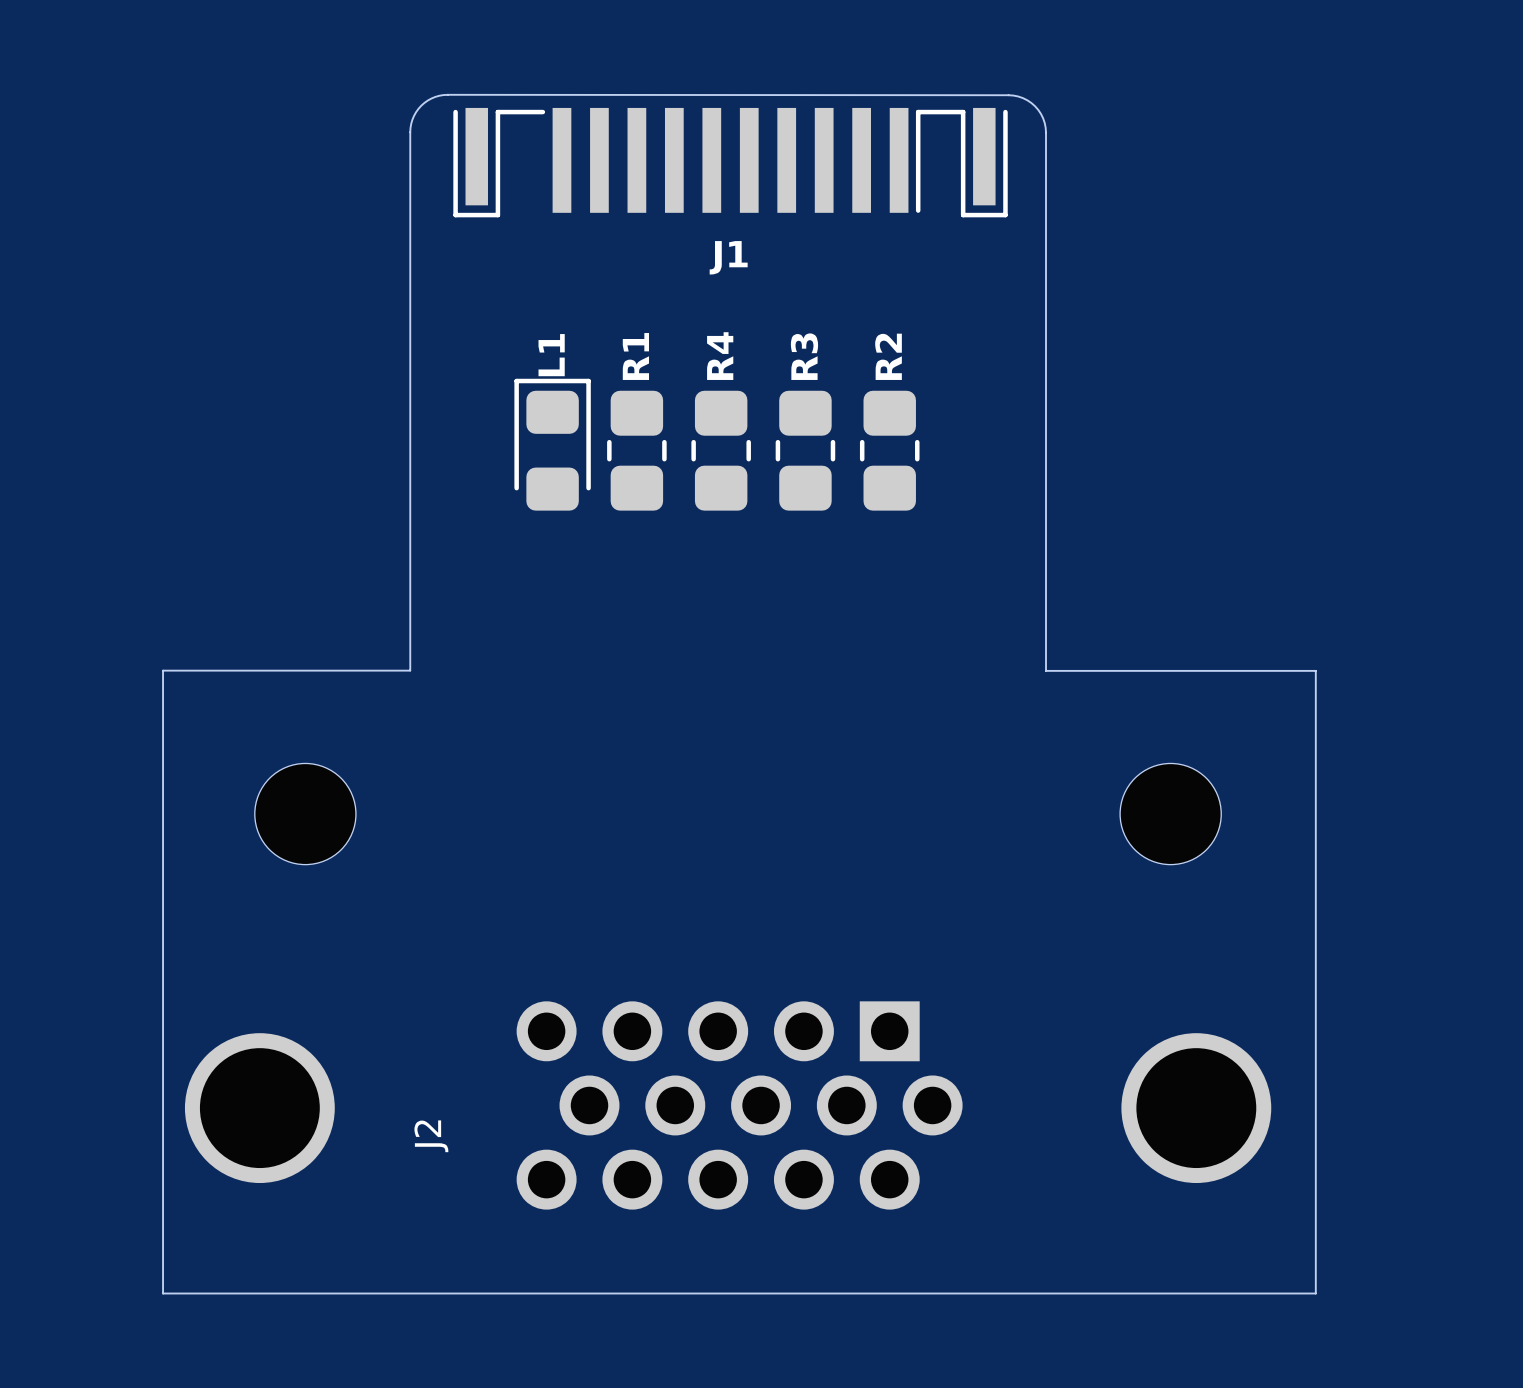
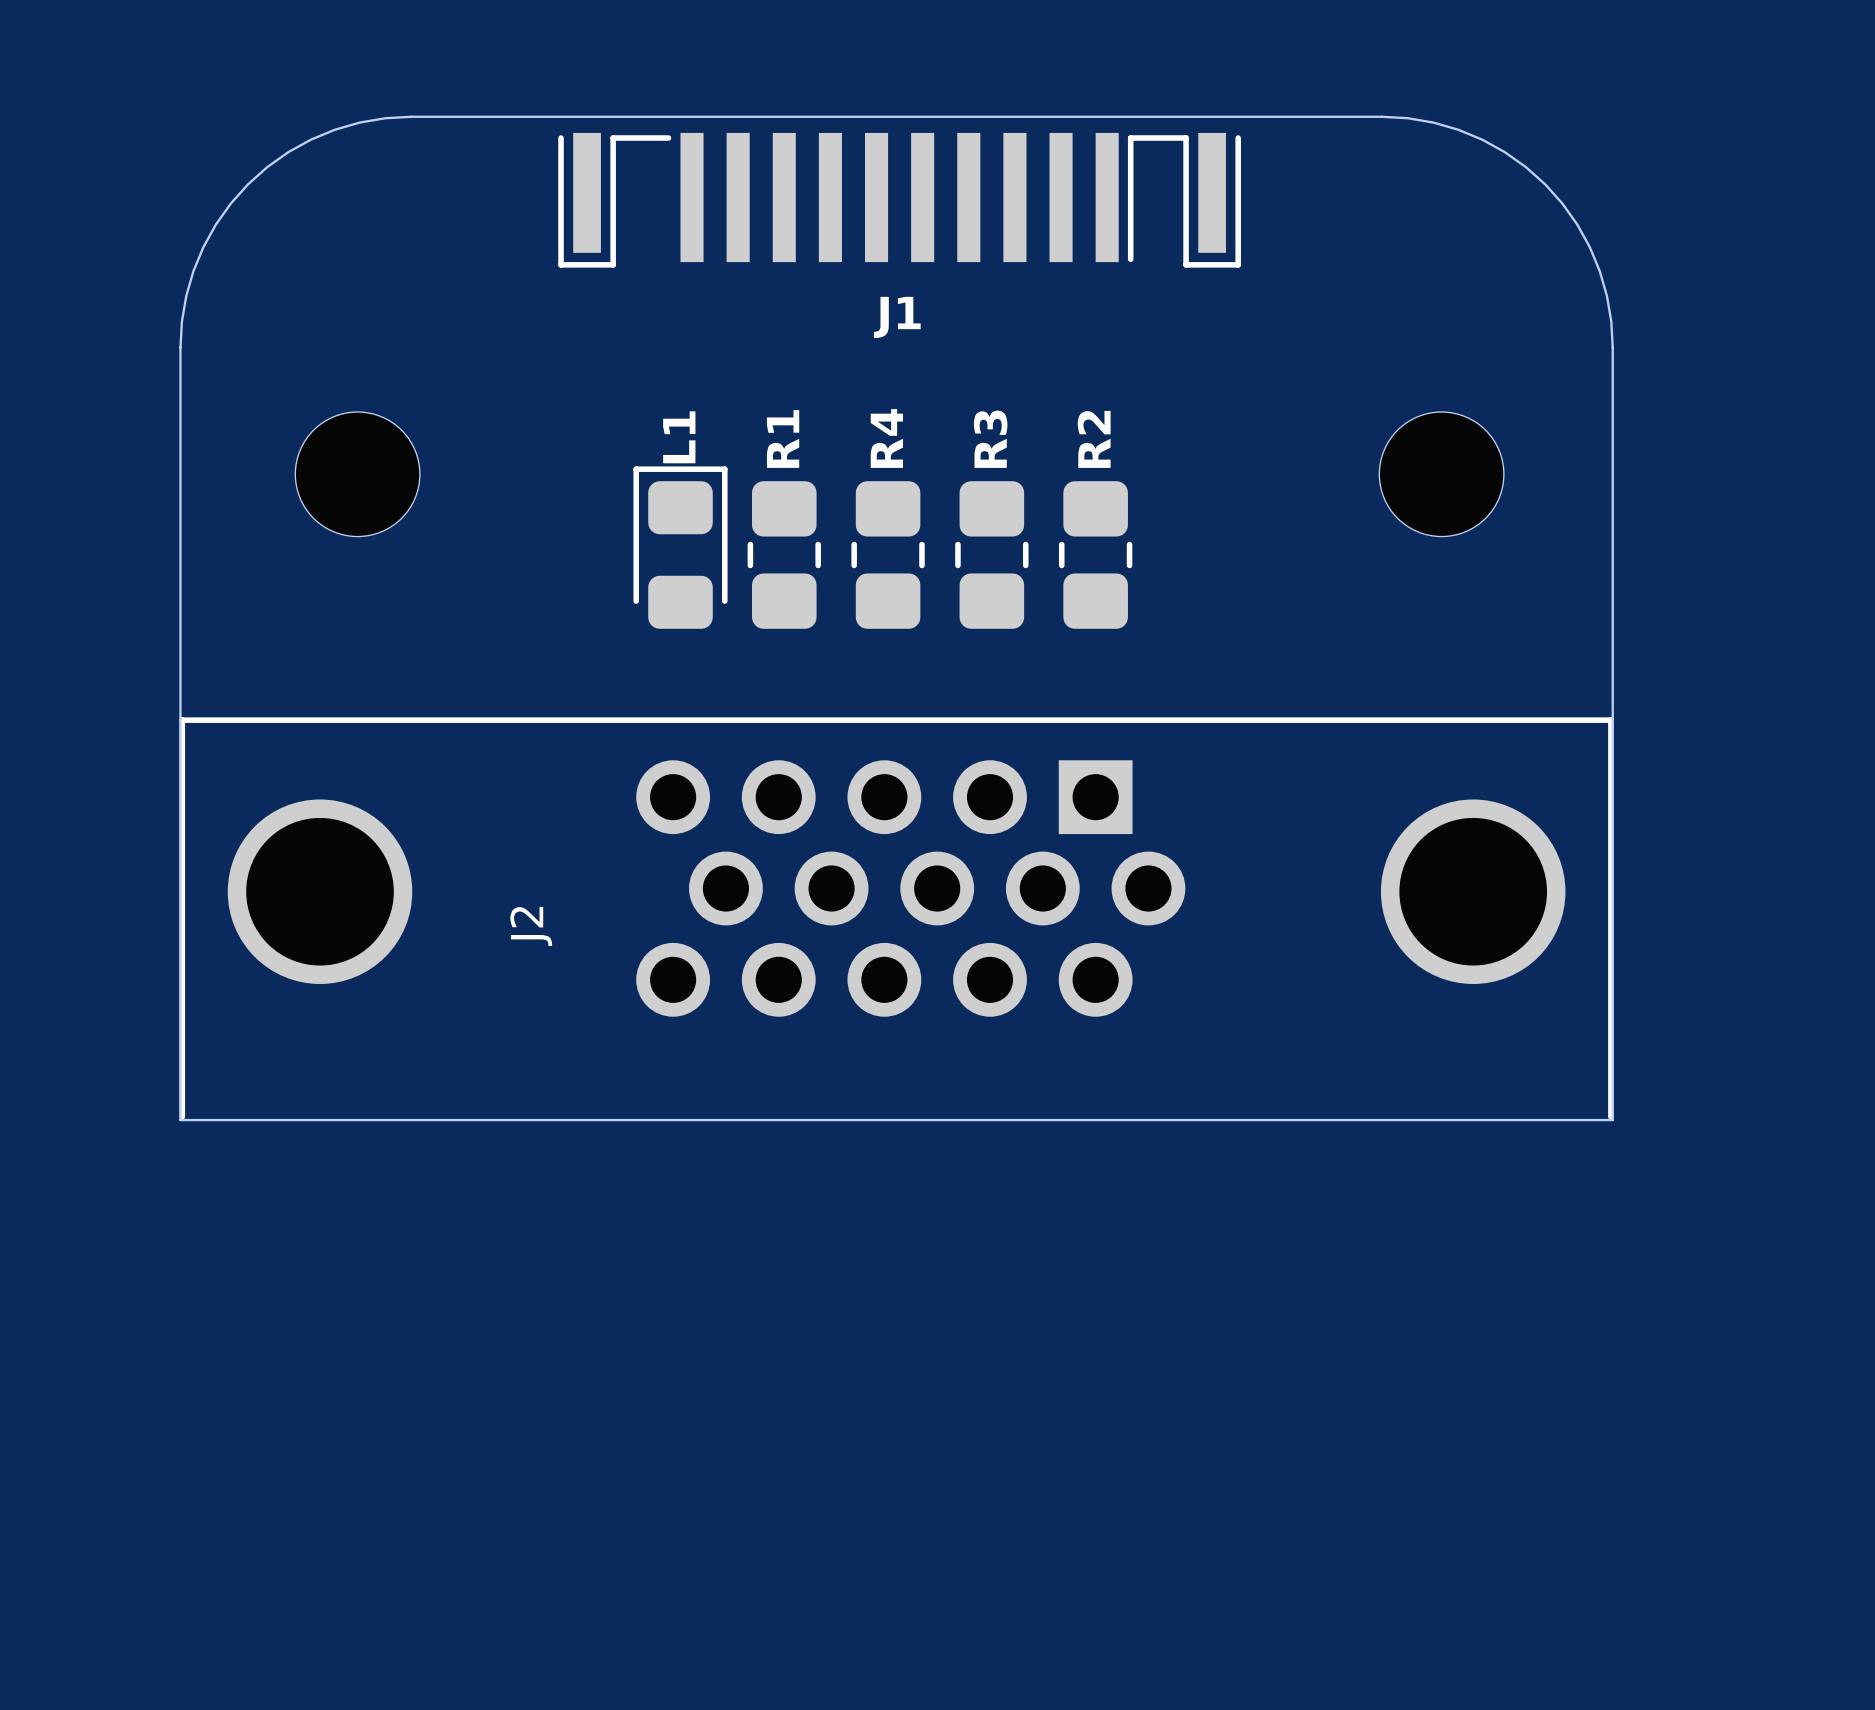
board edge: (447, 94) (1008, 95) (1022, 98) (1038, 109) (1043, 118) (1046, 132) (1046, 670) (1315, 670) (1315, 1293) (163, 1293) (163, 670) (410, 670) (410, 128) (413, 116) (421, 105) (431, 98) (447, 94) -> (411, 116) (385, 118) (334, 129) (311, 139) (267, 167) (230, 203) (215, 224) (203, 247) (186, 296) (180, 347) (180, 1120) (1612, 1120) (1611, 321) (1599, 271) (1577, 224) (1562, 203) (1525, 167) (1504, 152) (1458, 129) (1433, 122) (1382, 116) (411, 116)
part position: (305, 814) -> (357, 474)
part position: (1170, 814) -> (1441, 474)
J2 footprint: [184, 1001, 1272, 1210] -> [179, 717, 1614, 1120]

